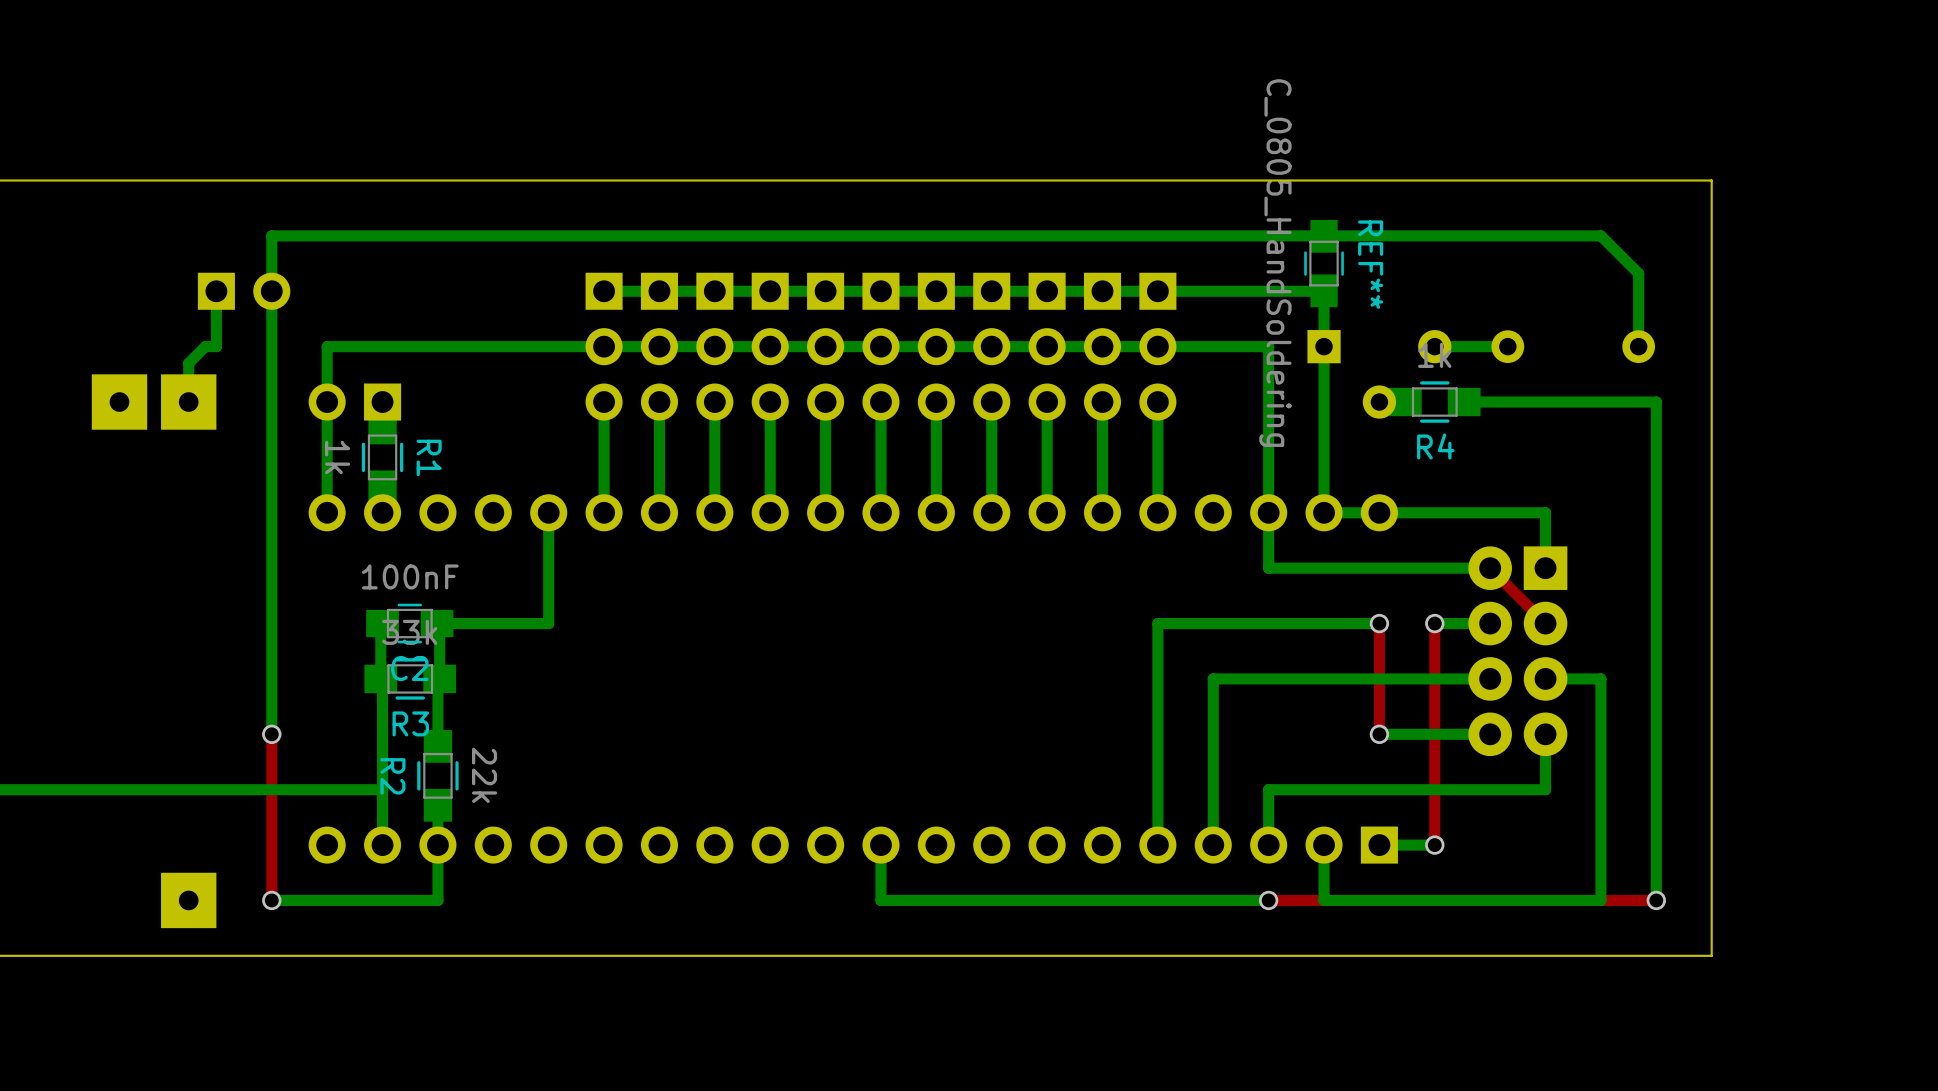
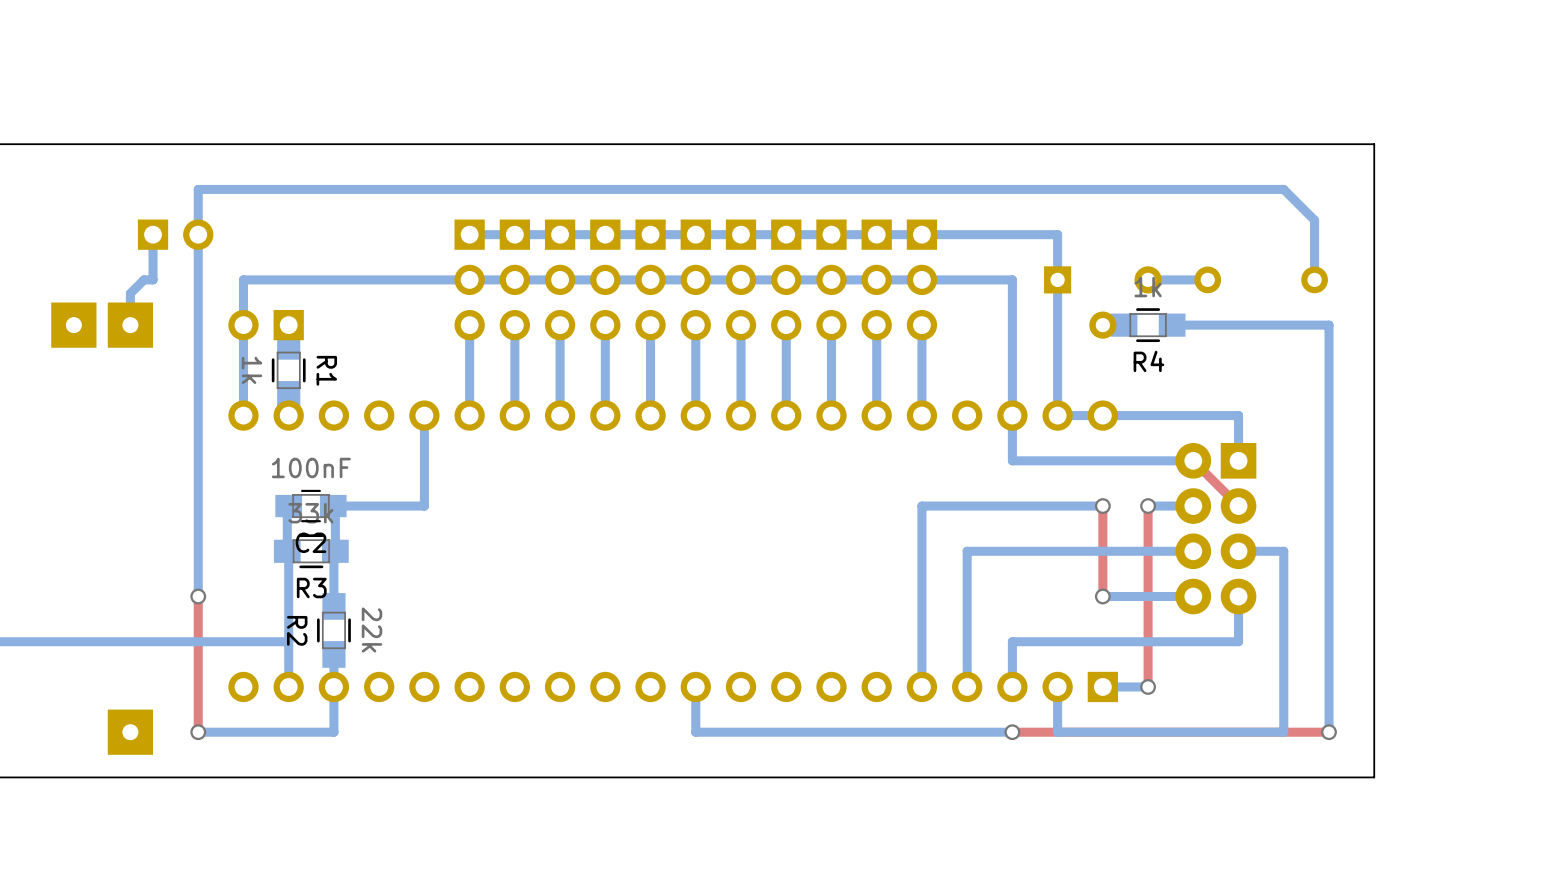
REF**: C_0805_HandSoldering (1324, 263) -> none

